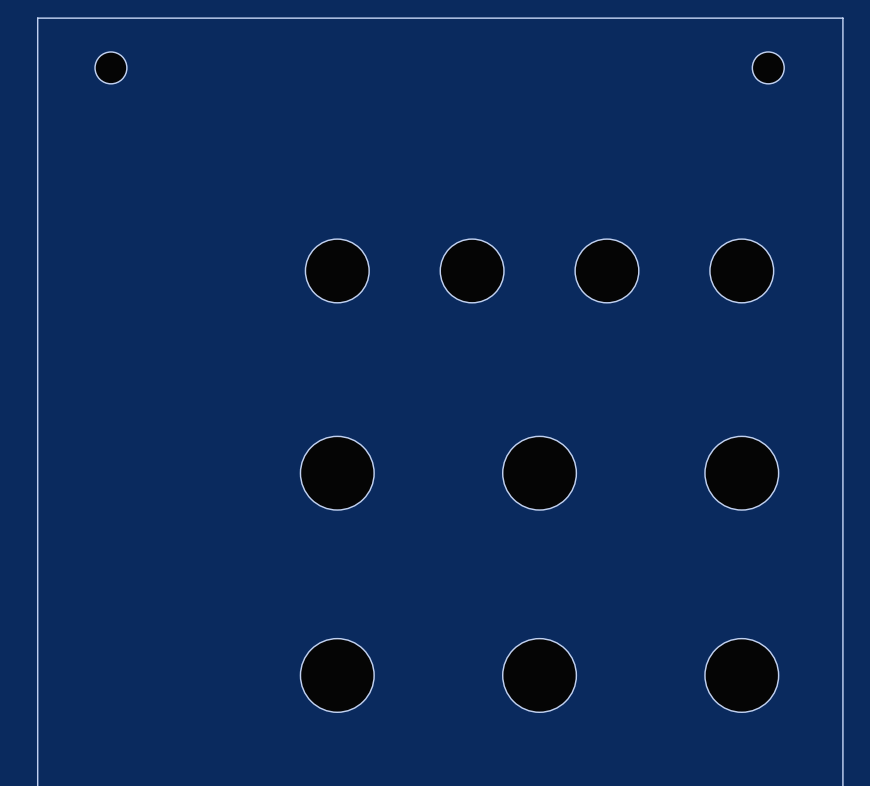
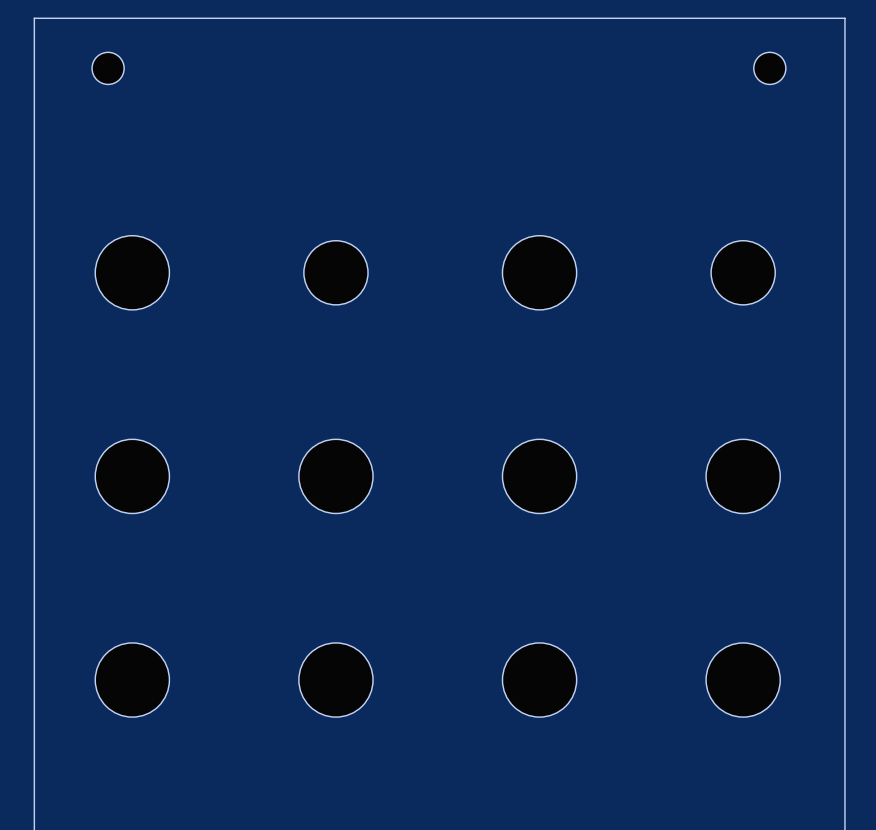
part: none -> (132, 272)
part: (472, 270) -> none
part: none -> (539, 272)
part: (606, 270) -> none
part: none -> (132, 476)
part: none -> (132, 680)

